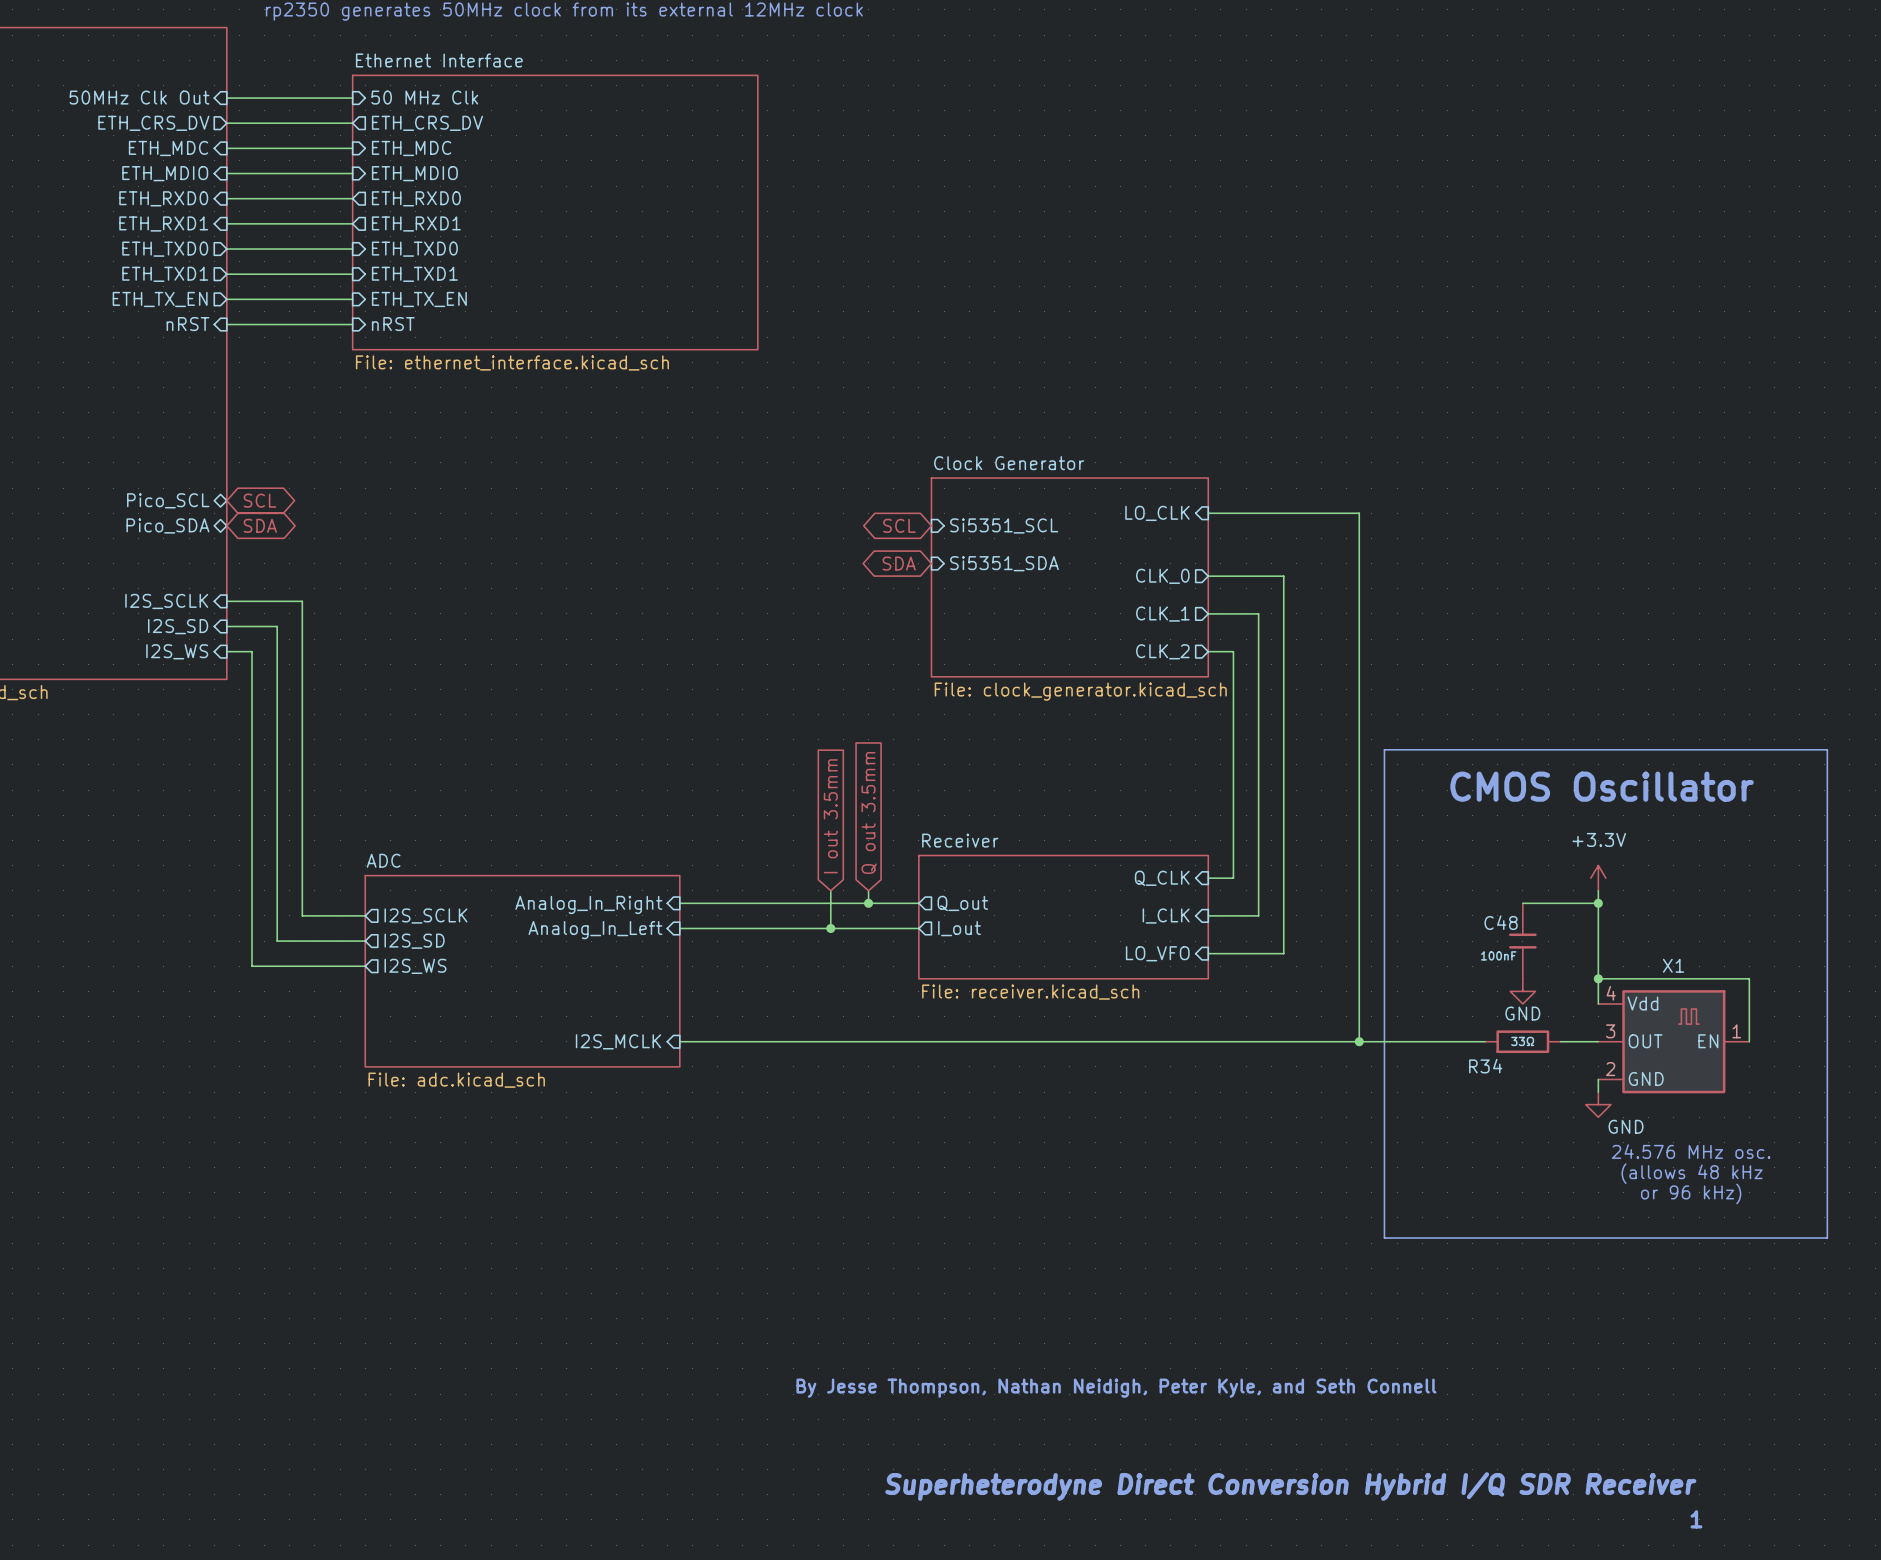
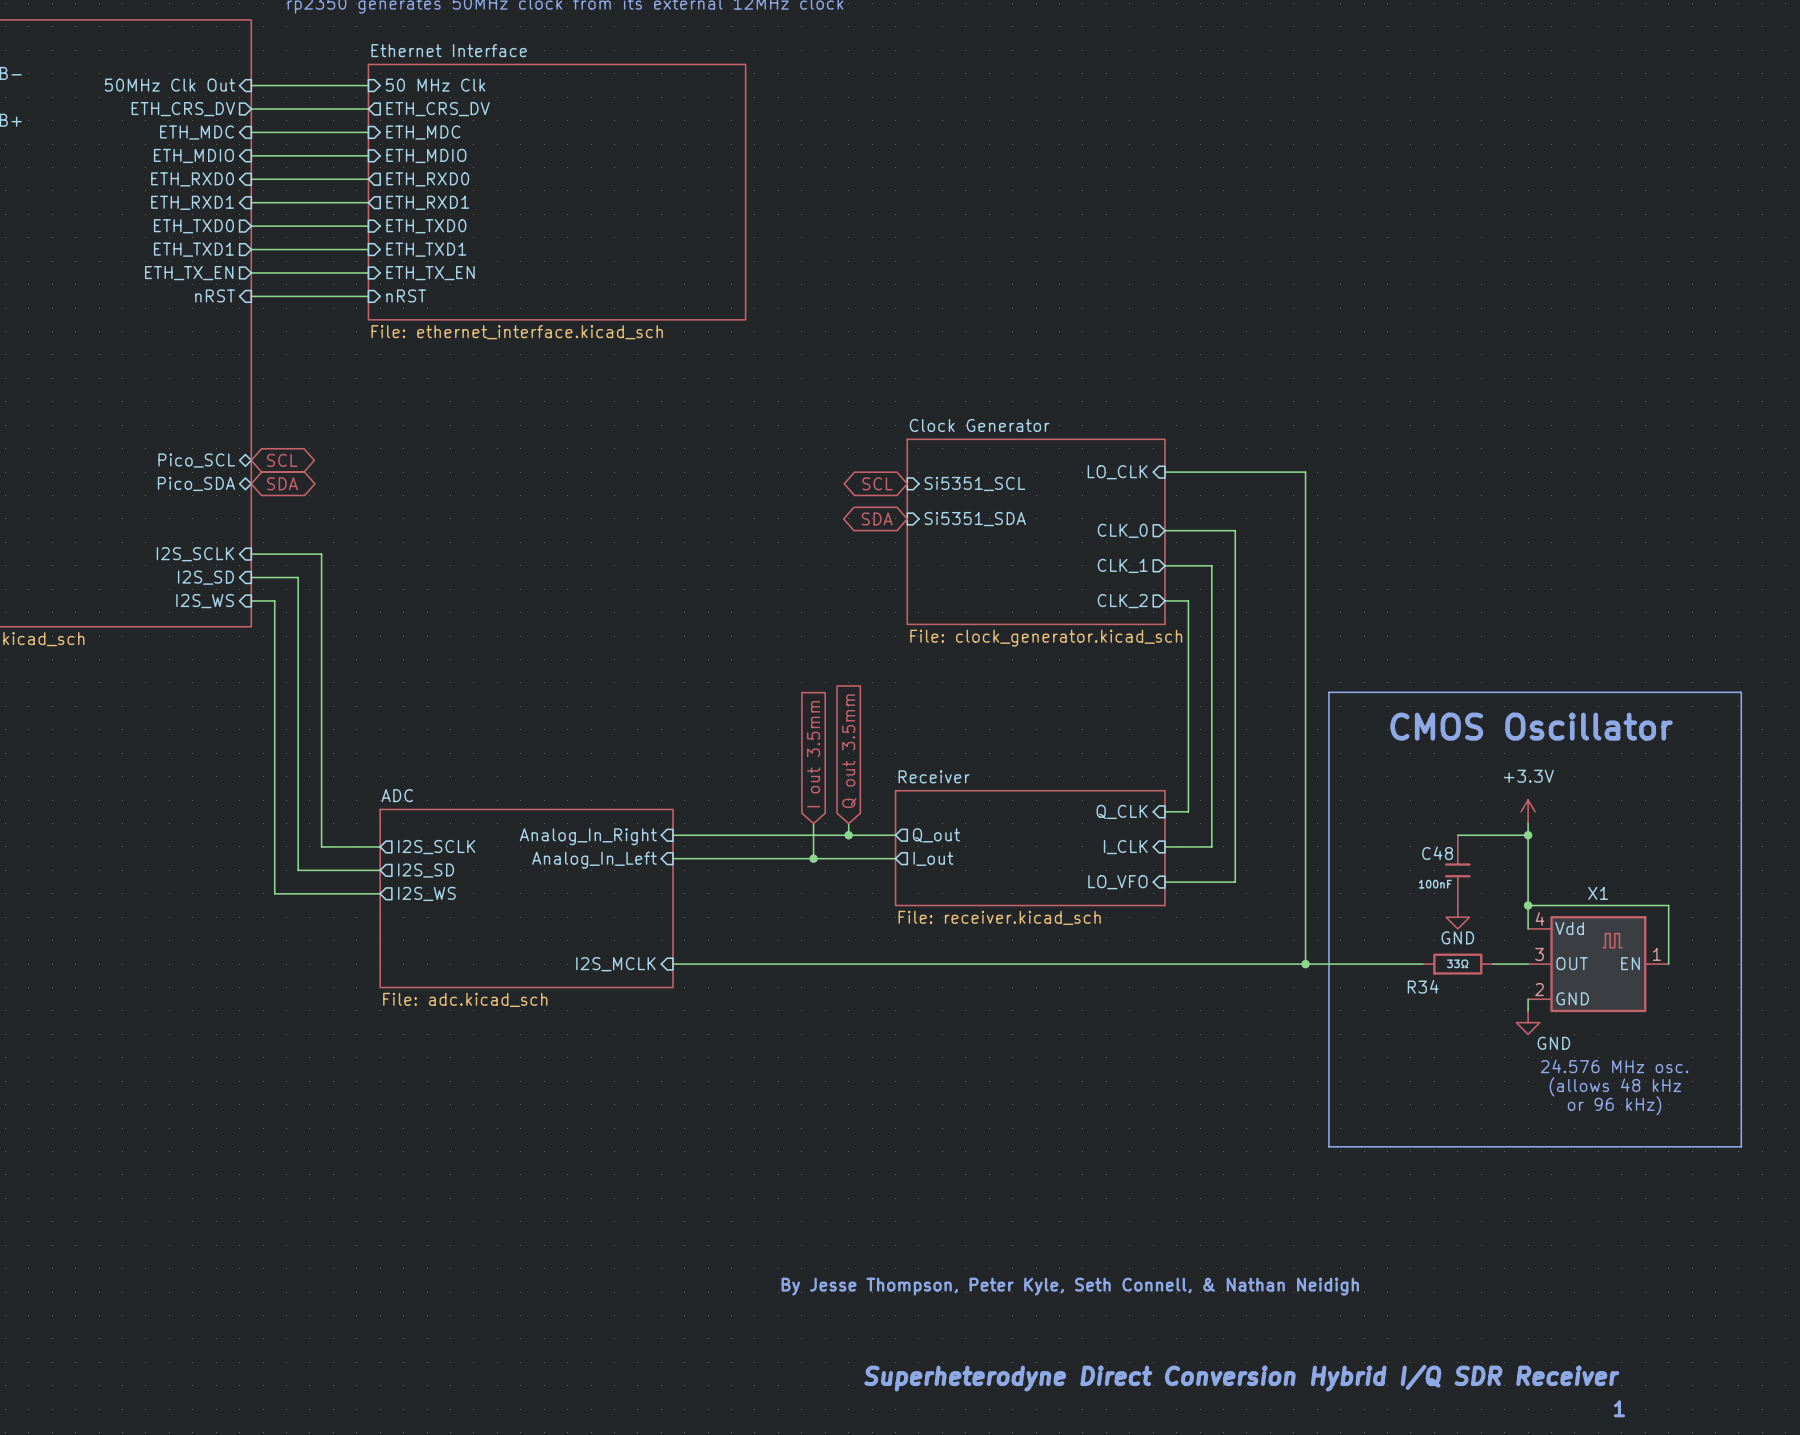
text: By Jesse Thompson, Nathan Neidigh, Peter Kyle, and Seth Connell (1116, 1388) -> By Jesse Thompson, Peter Kyle, Seth Connell, & Nathan Neidigh (1070, 1286)

